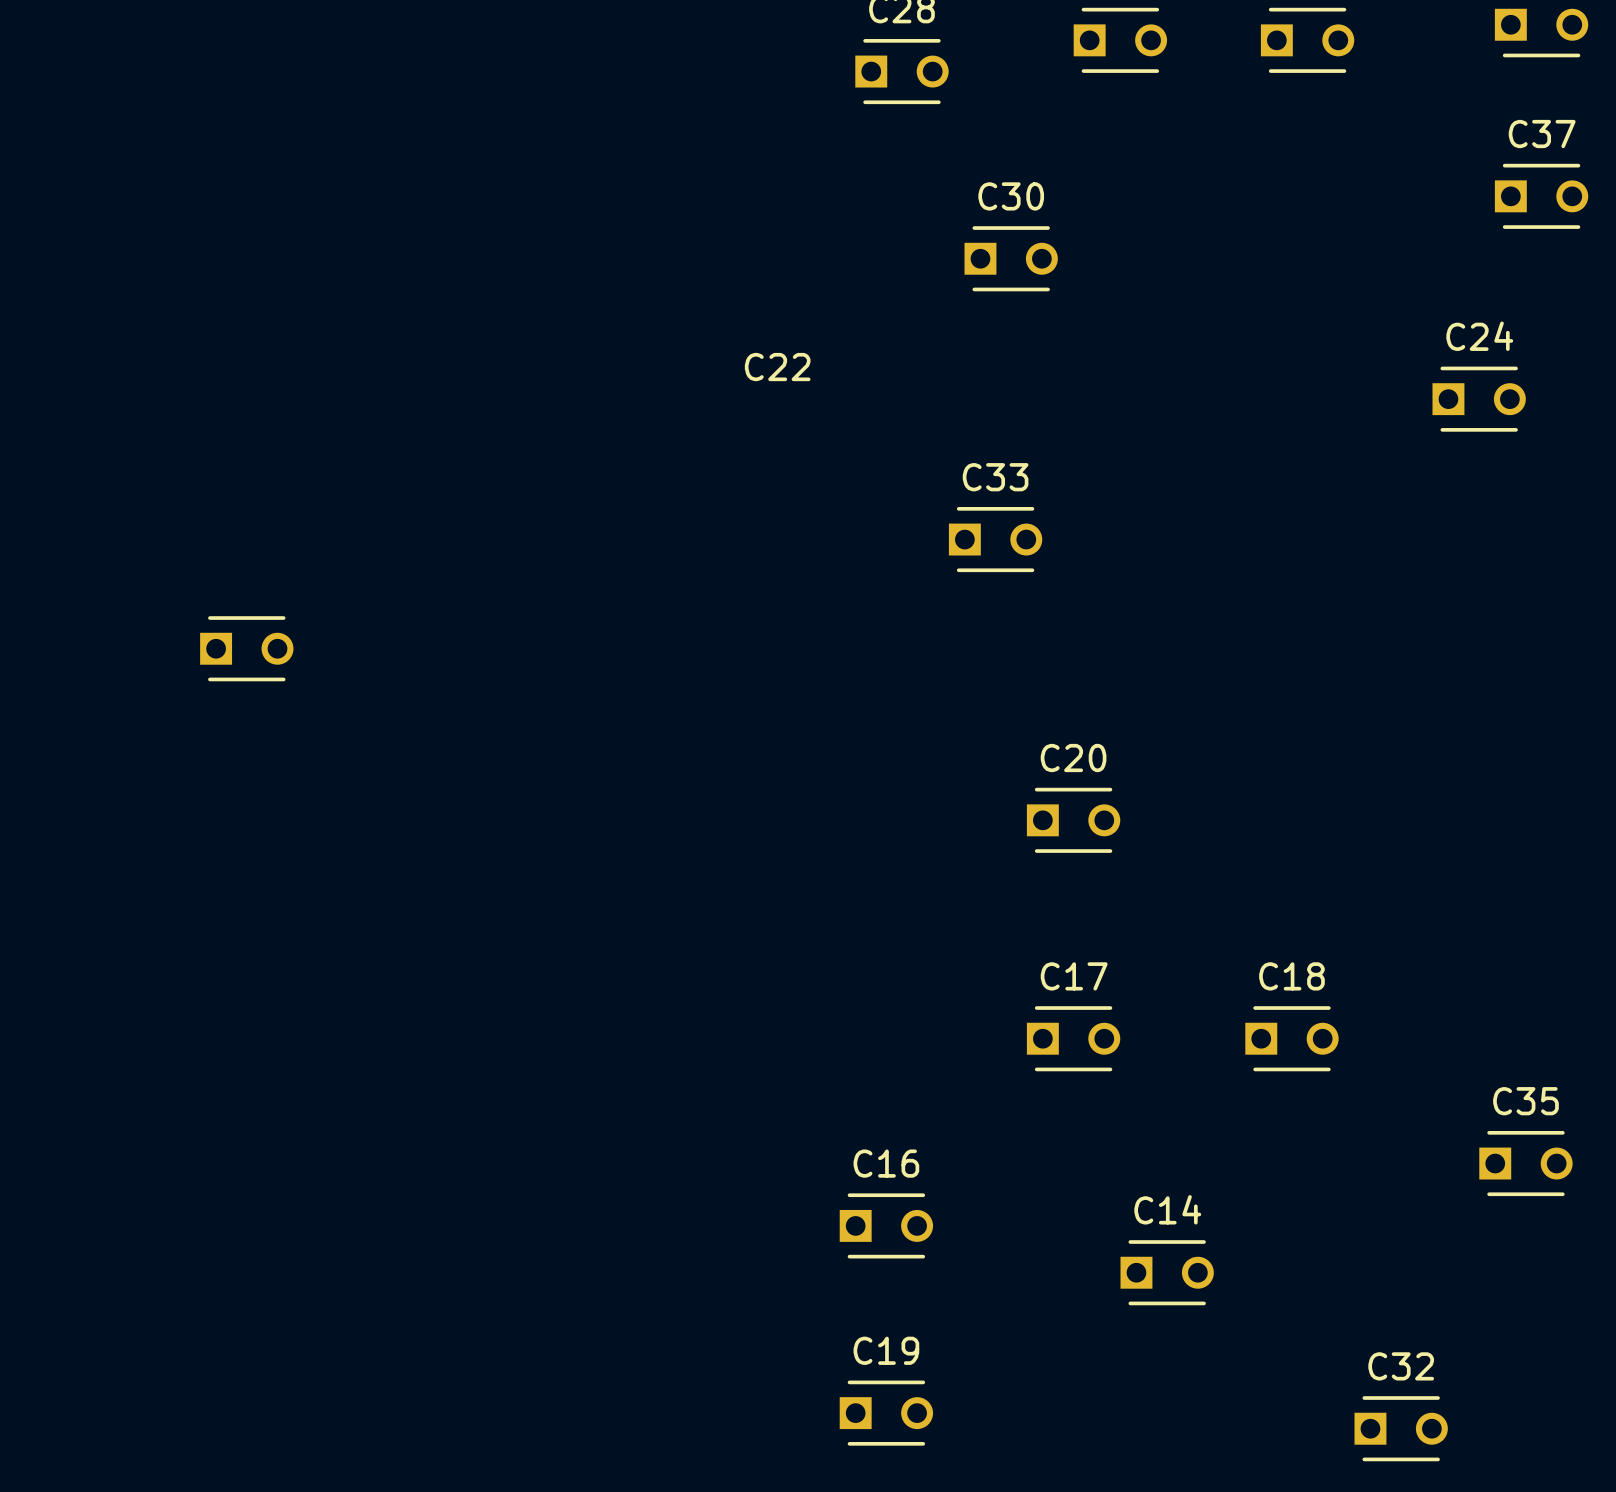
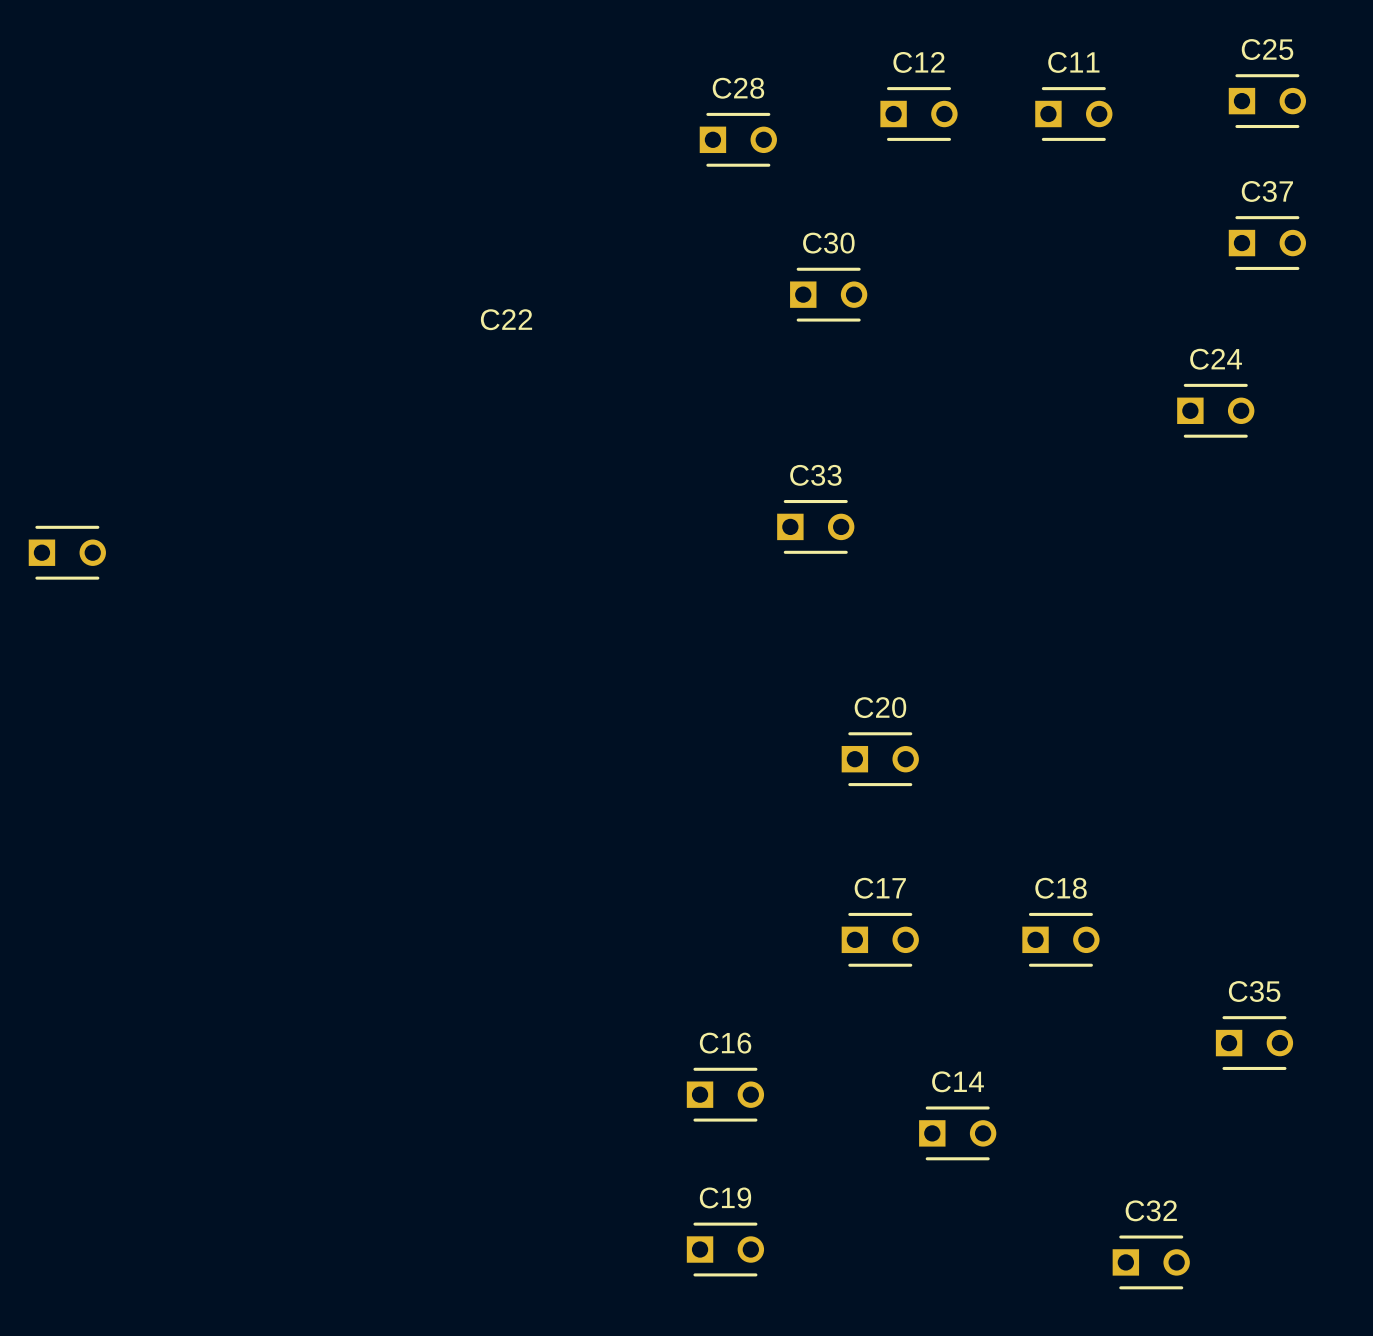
C22 position: (246, 648) -> (67, 552)

